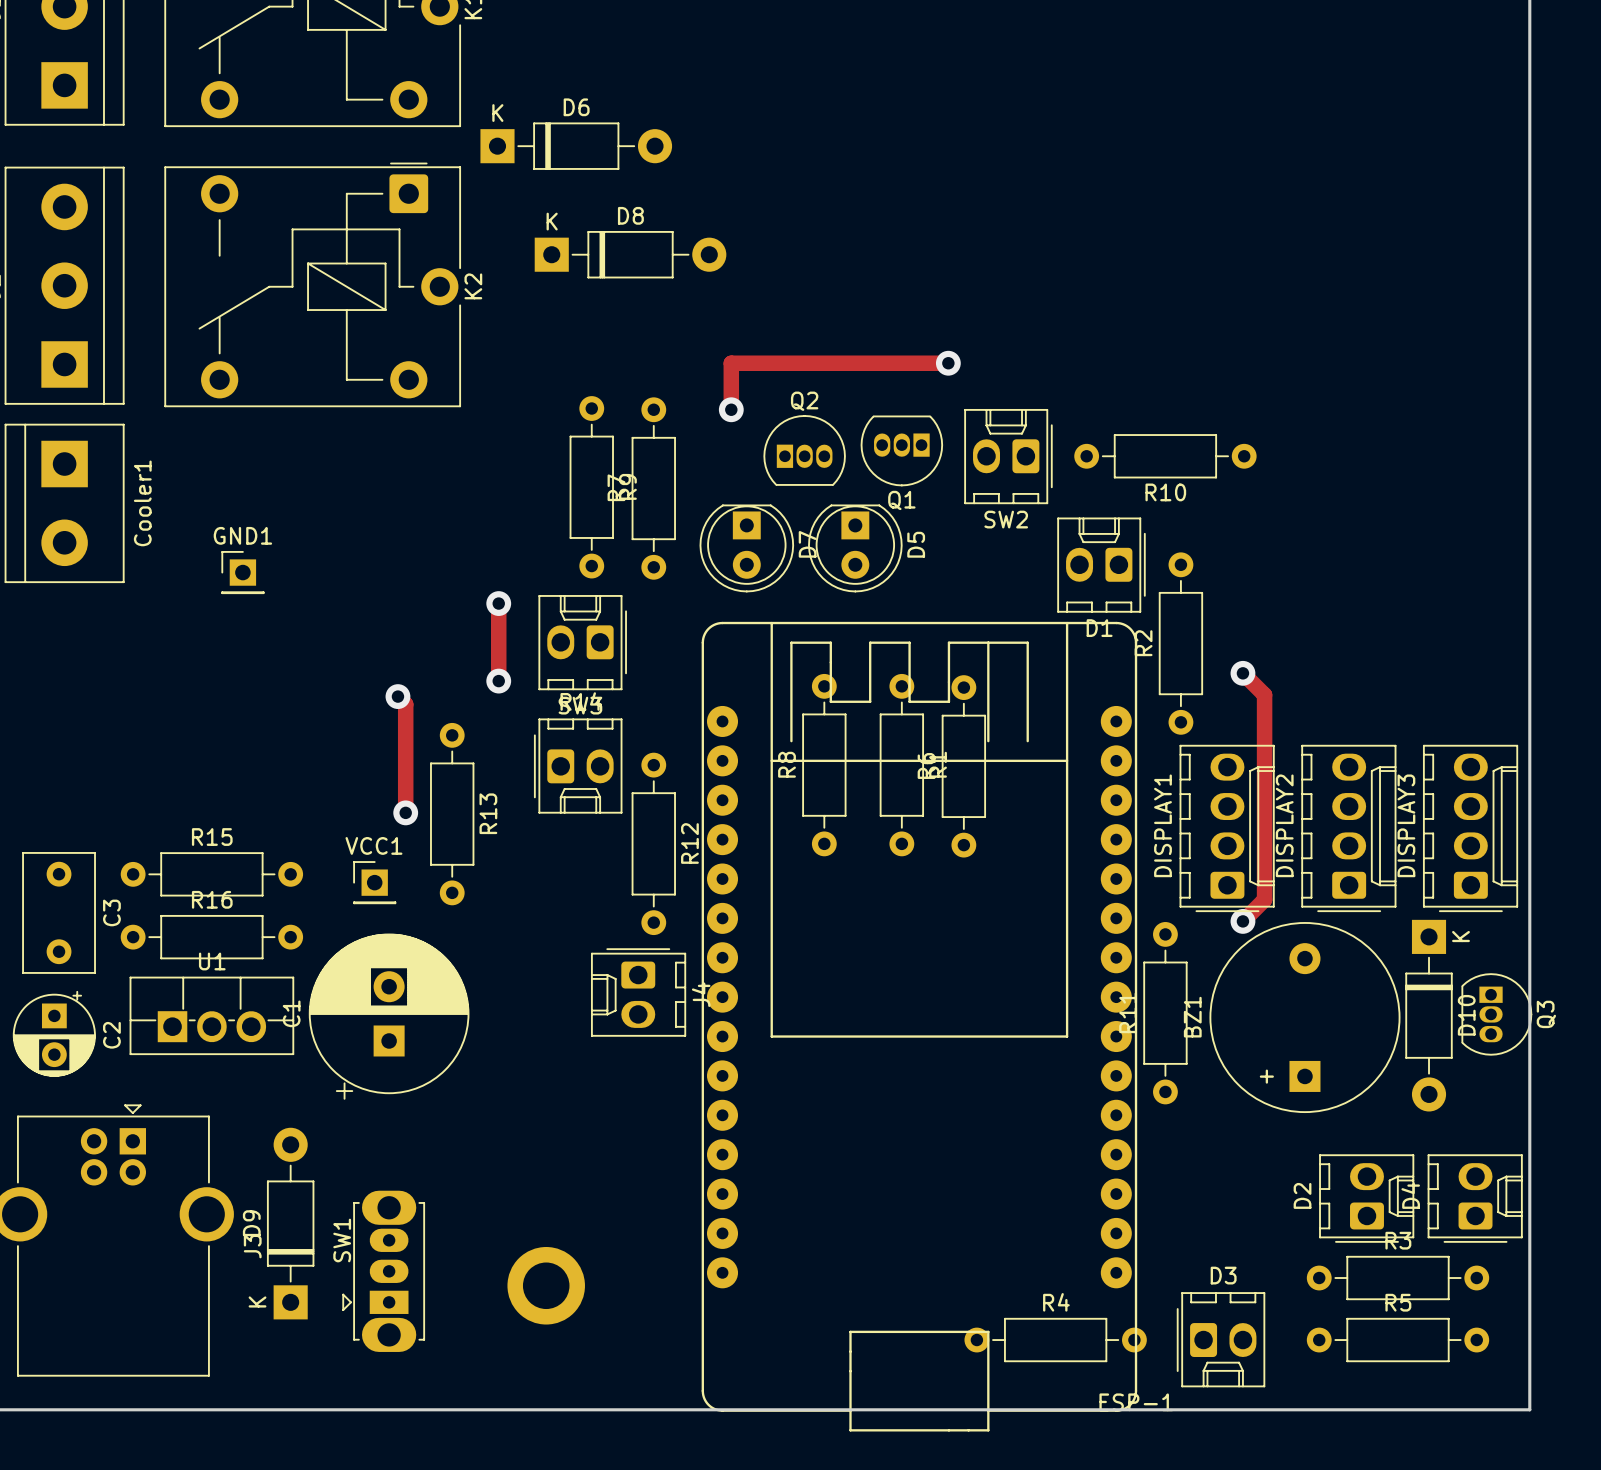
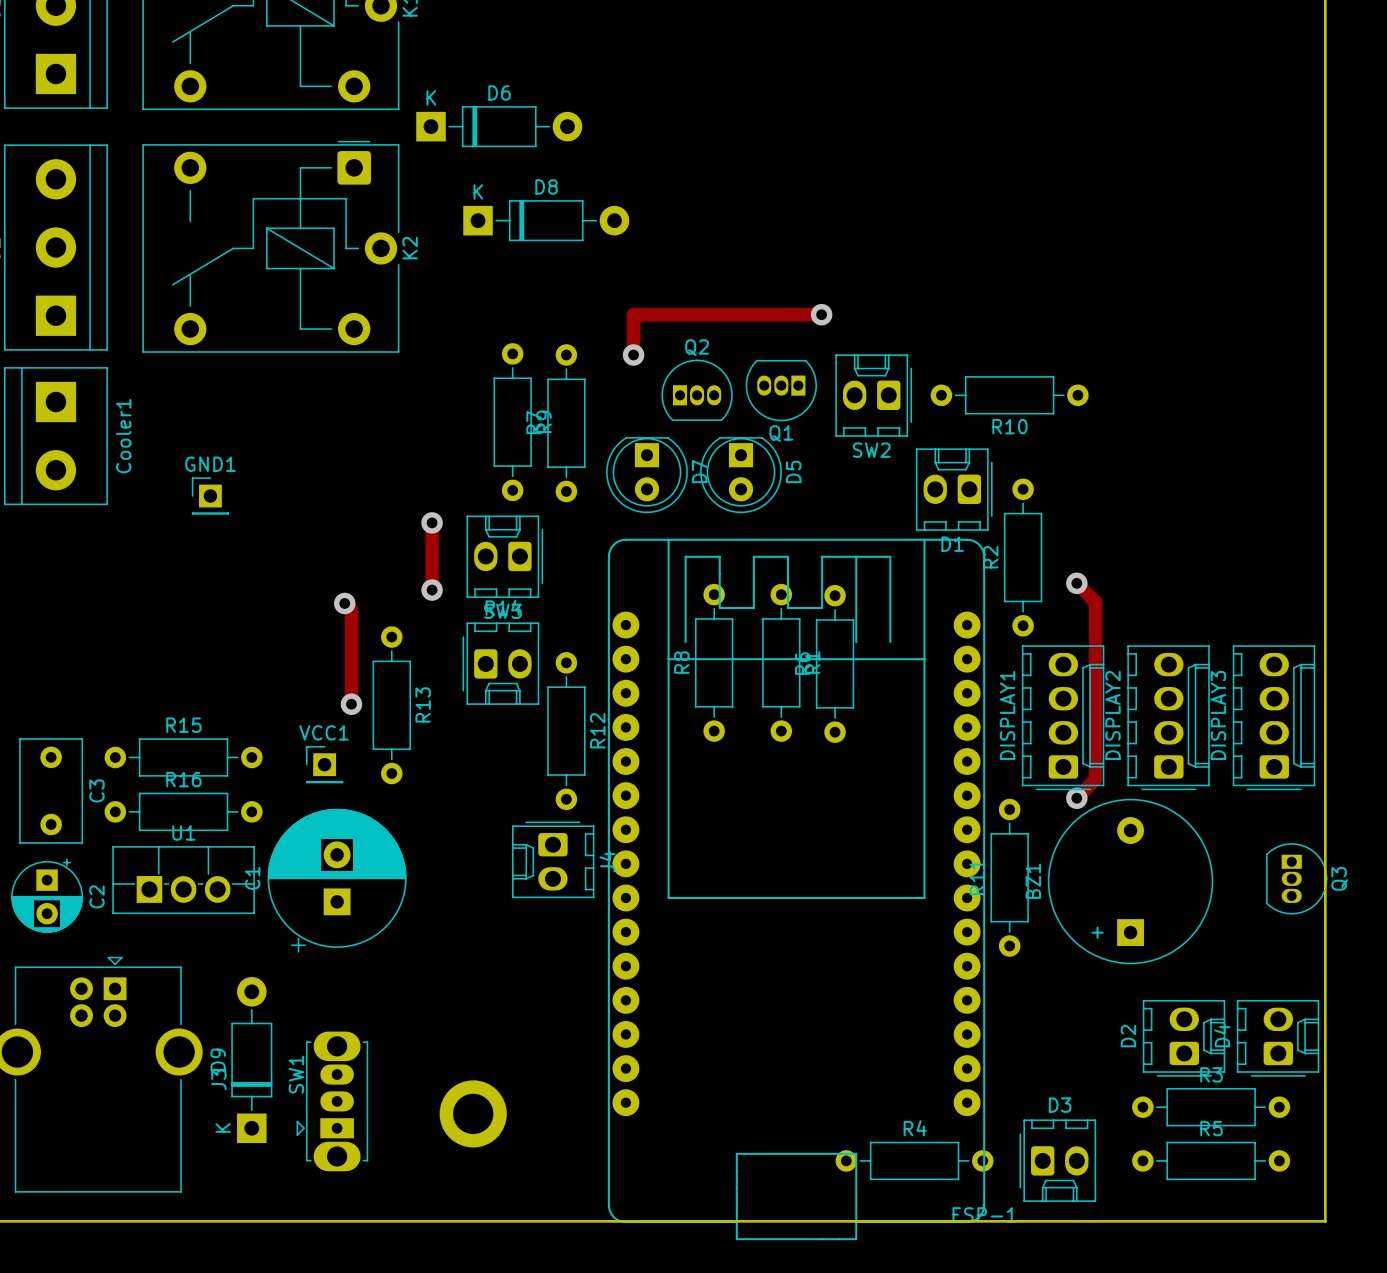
D10: (1429, 1015) -> none

